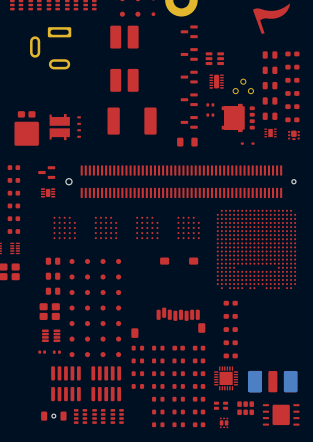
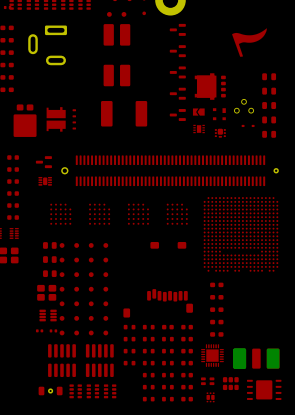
part: none -> (7, 7)
part: (122, 14) -> none
part: (137, 14) -> none
part: none -> (109, 14)
part: none -> (123, 14)
drawing position: (271, 18) -> (249, 42)
part: none -> (7, 27)
part: none -> (7, 40)
part: (292, 53) -> none
part: (270, 55) -> none
part: none -> (7, 52)
part: (214, 58) -> none
part: (292, 67) -> none
part: none -> (7, 65)
part: (270, 70) -> none
part: (292, 80) -> none
part: (216, 81) -> none
part: none -> (269, 76)
part: none -> (7, 77)
part: (270, 85) -> none
part position: (243, 86) -> (244, 106)
part: (292, 93) -> none
part: none -> (7, 89)
part: none -> (269, 91)
part: (270, 100) -> none
part: (210, 104) -> none
part: (292, 106) -> none
part: none -> (269, 105)
part footprint: [206, 113, 215, 117] -> [192, 108, 205, 116]
part: (270, 116) -> none
part position: (238, 117) -> (210, 86)
part: (292, 119) -> none
part: none -> (219, 114)
part: none -> (269, 119)
part position: (270, 132) -> (199, 129)
part position: (293, 135) -> (220, 133)
part: (187, 142) -> none
part: none -> (269, 134)
part position: (247, 143) -> (248, 125)
part: none -> (62, 245)
part: (72, 261) -> none
part: none -> (76, 245)
part: (87, 261) -> none
part: none -> (91, 245)
part: (103, 261) -> none
part: none -> (105, 245)
part: (118, 261) -> none
part: none -> (62, 260)
part: (72, 276) -> none
part: none -> (76, 260)
part: (87, 276) -> none
part: none -> (91, 260)
part: (103, 276) -> none
part: none -> (105, 260)
part: (118, 276) -> none
part: none -> (62, 274)
part: (72, 292) -> none
part: none -> (76, 274)
part: (87, 292) -> none
part: none -> (91, 274)
part: (103, 292) -> none
part: none -> (105, 274)
part: (118, 292) -> none
part: none -> (62, 289)
part: none -> (76, 289)
part: none -> (91, 289)
part: none -> (105, 289)
part: (72, 308) -> none
part: (87, 308) -> none
part: (103, 308) -> none
part: (118, 308) -> none
part: none -> (62, 303)
part: (72, 323) -> none
part: none -> (76, 303)
part: (87, 323) -> none
part: none -> (91, 303)
part: (103, 323) -> none
part: none -> (105, 303)
part: (118, 323) -> none
part: none -> (62, 318)
part: none -> (76, 318)
part: none -> (91, 318)
part: none -> (105, 318)
part: (72, 339) -> none
part: (87, 339) -> none
part: (103, 339) -> none
part: (118, 339) -> none
part: none -> (62, 332)
part: (72, 354) -> none
part: none -> (76, 332)
part: (87, 354) -> none
part: none -> (91, 332)
part: (103, 354) -> none
part: none -> (105, 332)
part: (118, 354) -> none

